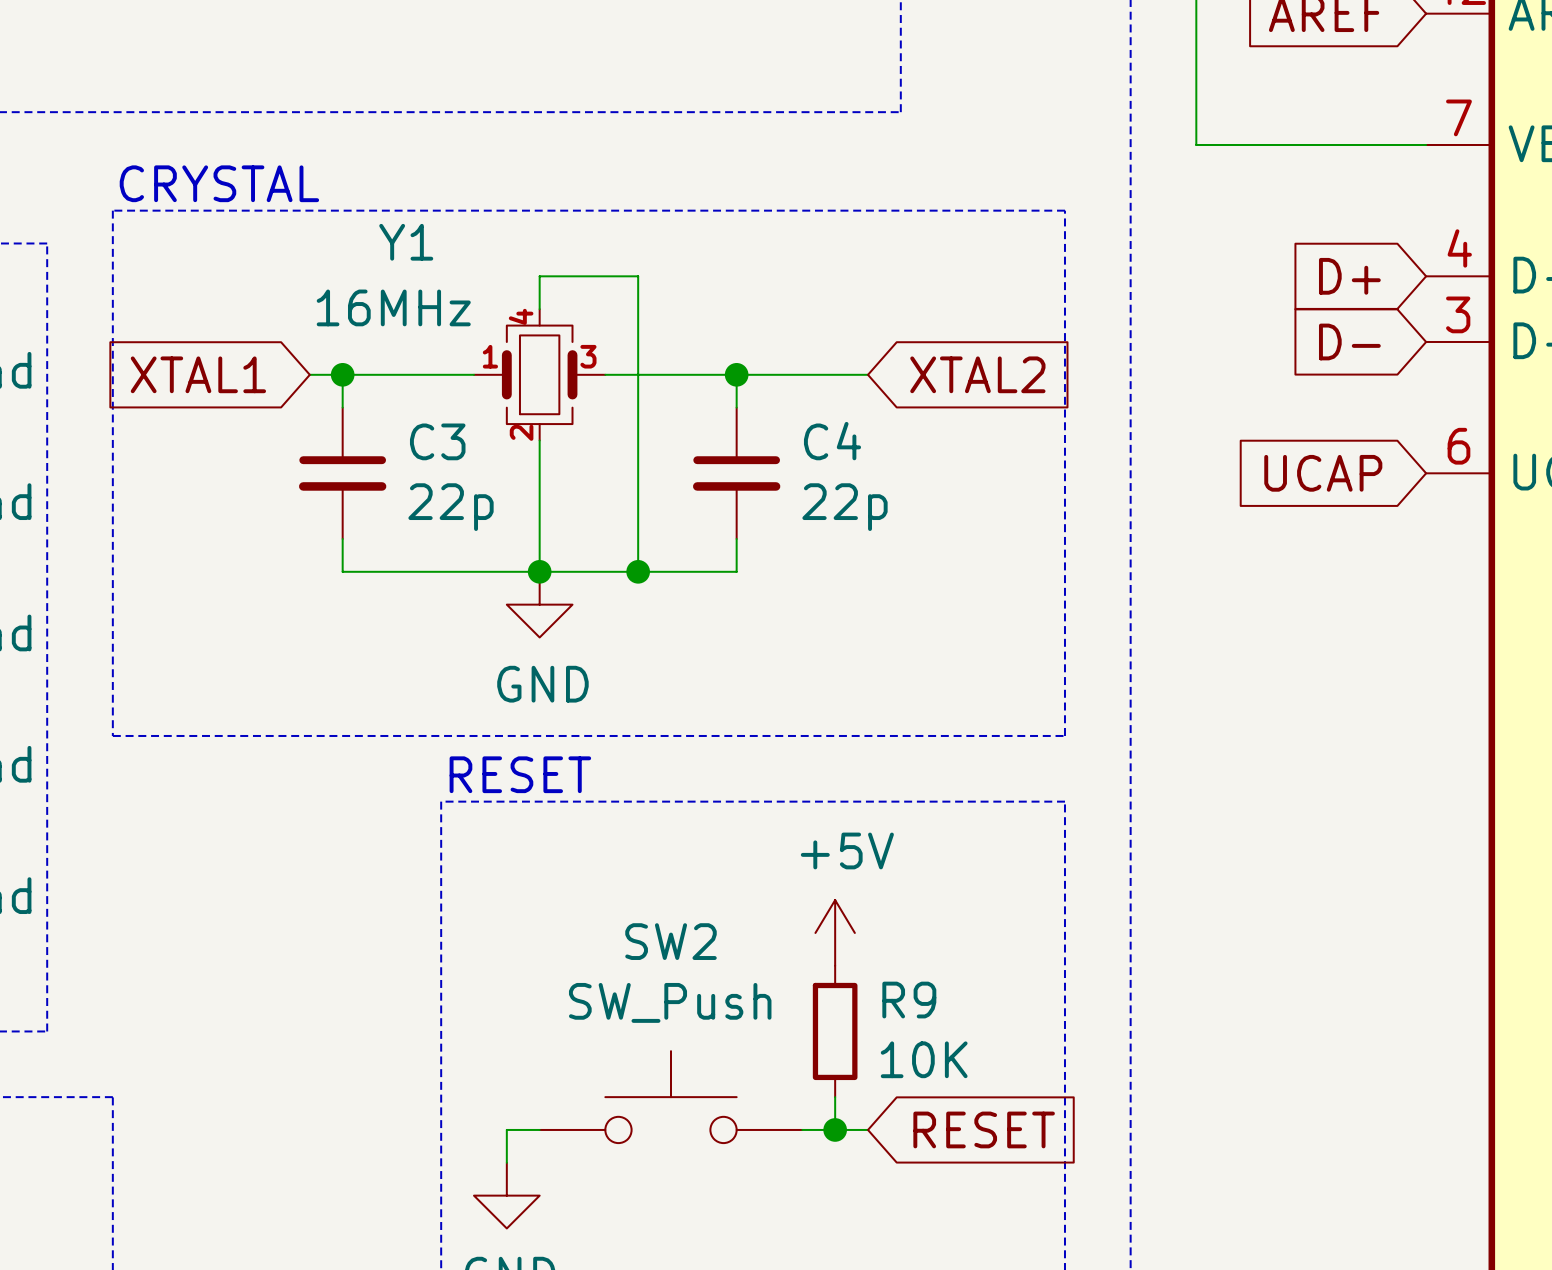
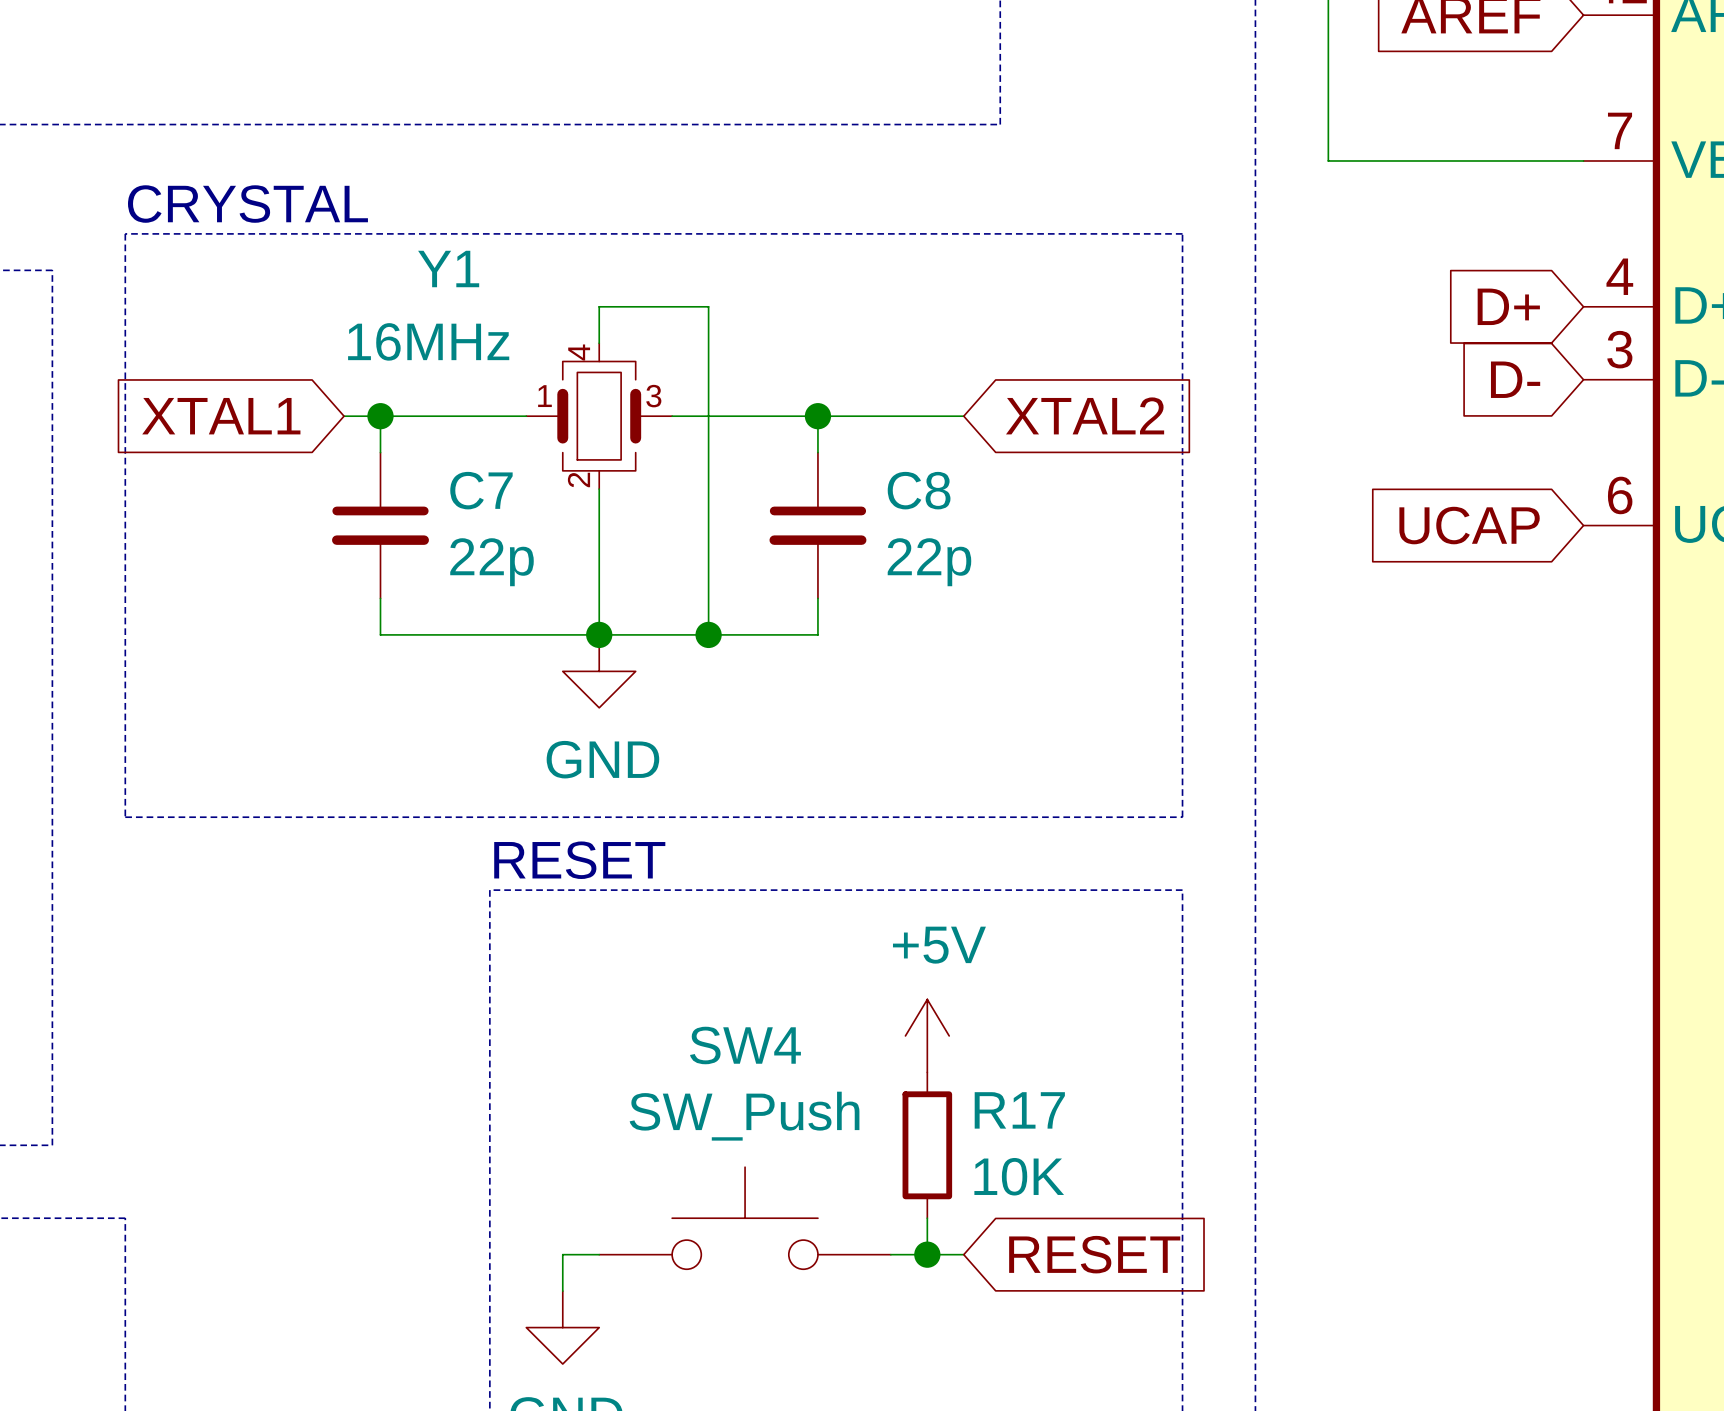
C3 name: C3 (437, 441) -> C7 (481, 490)
C4 name: C4 (832, 441) -> C8 (919, 490)
SW2 name: SW2 (671, 941) -> SW4 (745, 1045)
R9 name: R9 (909, 1000) -> R17 (1019, 1110)

